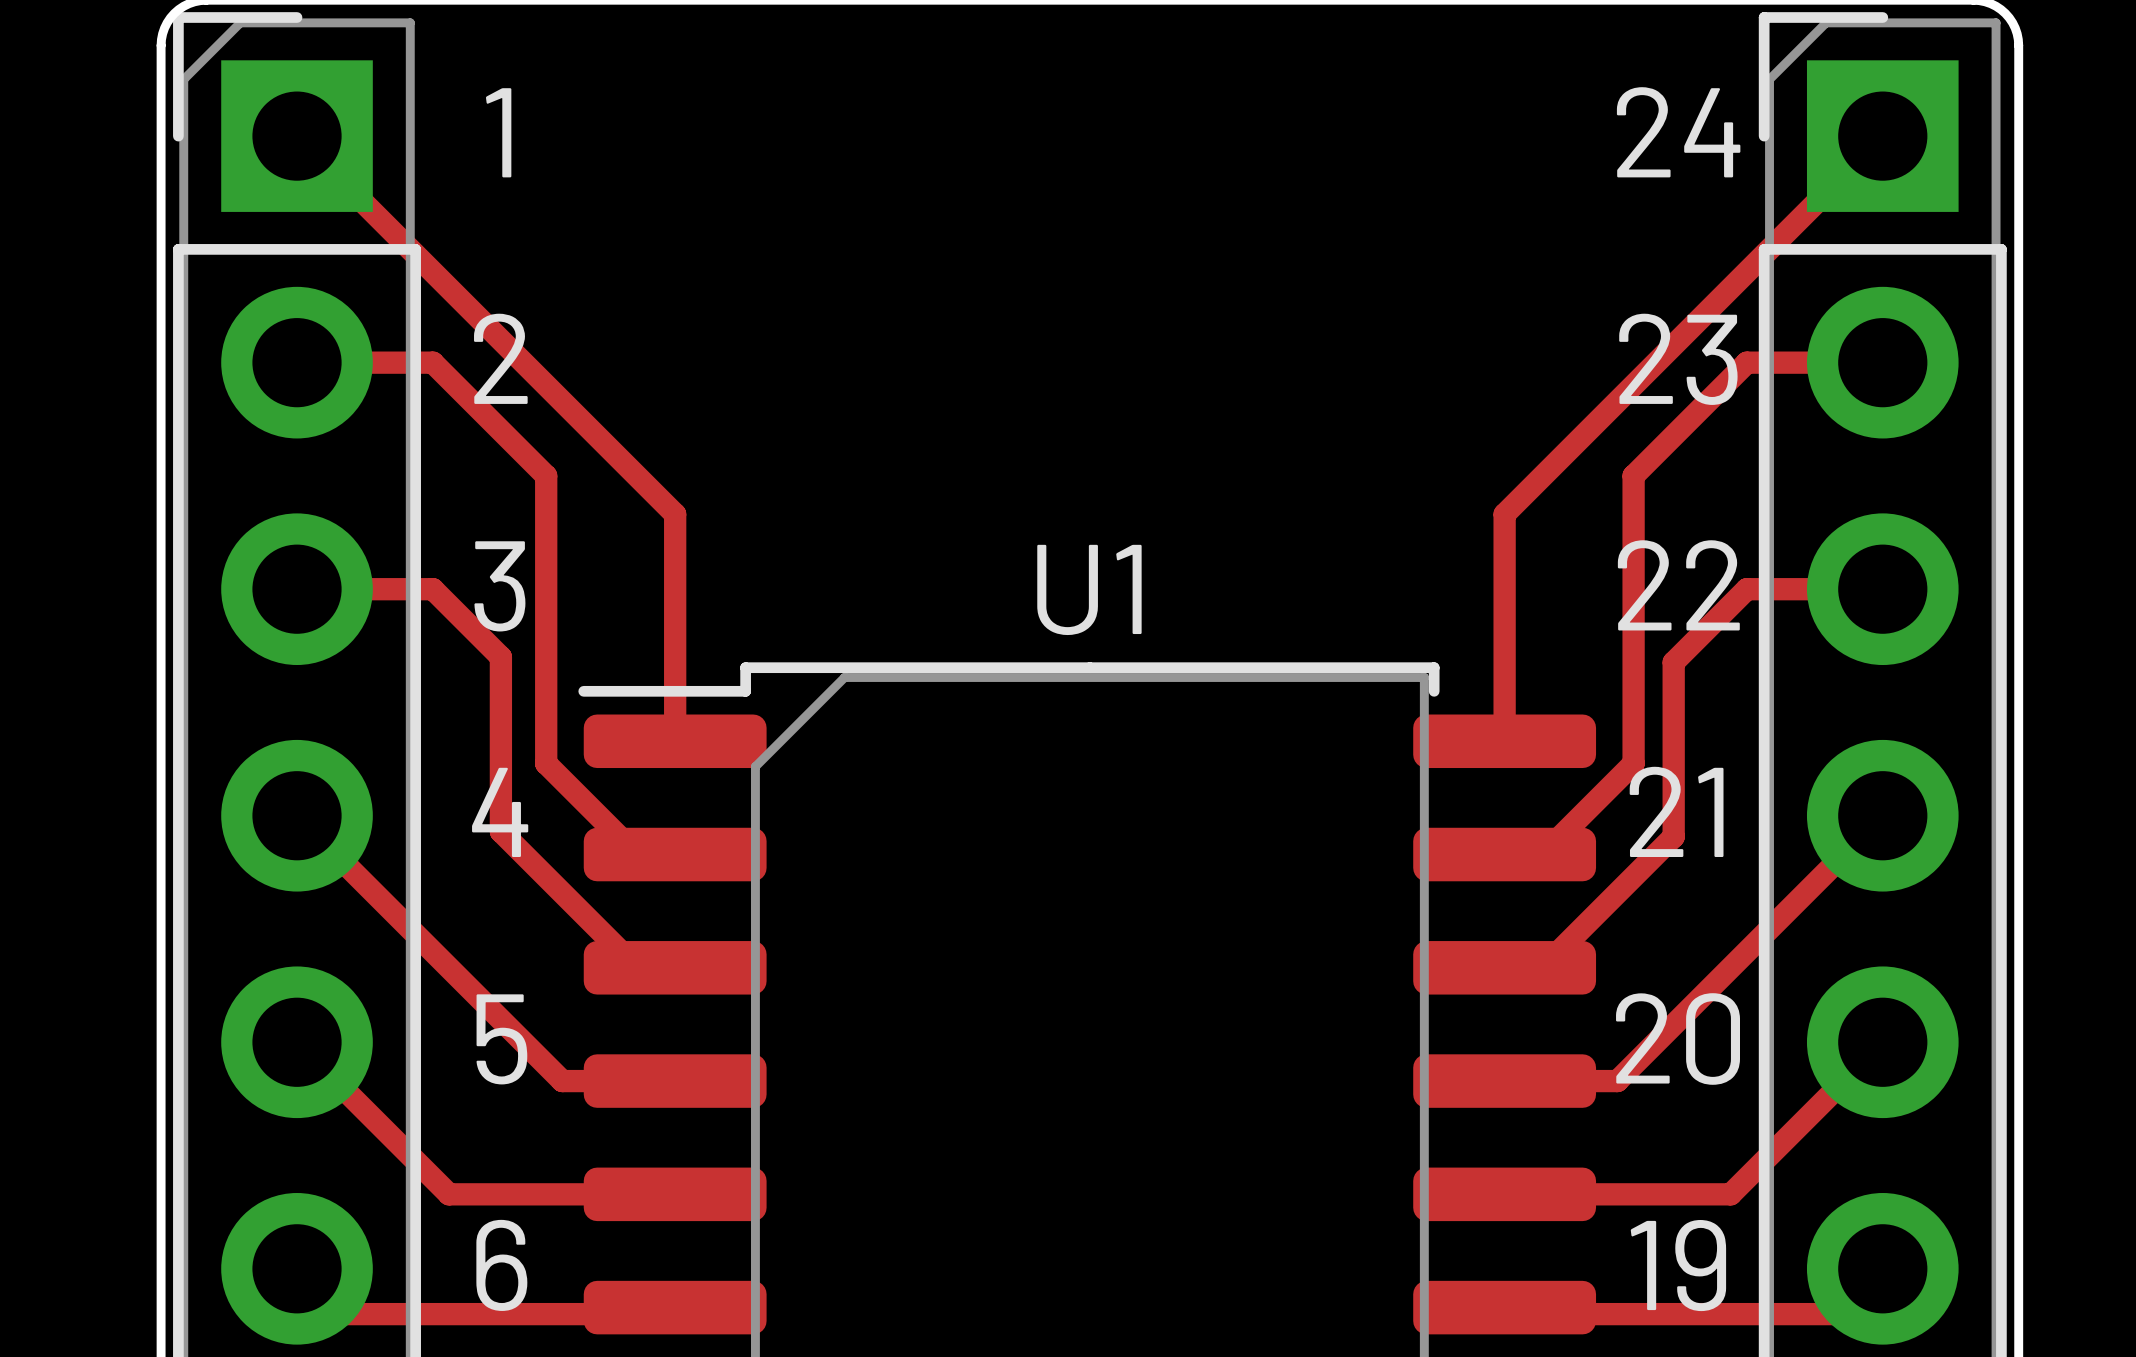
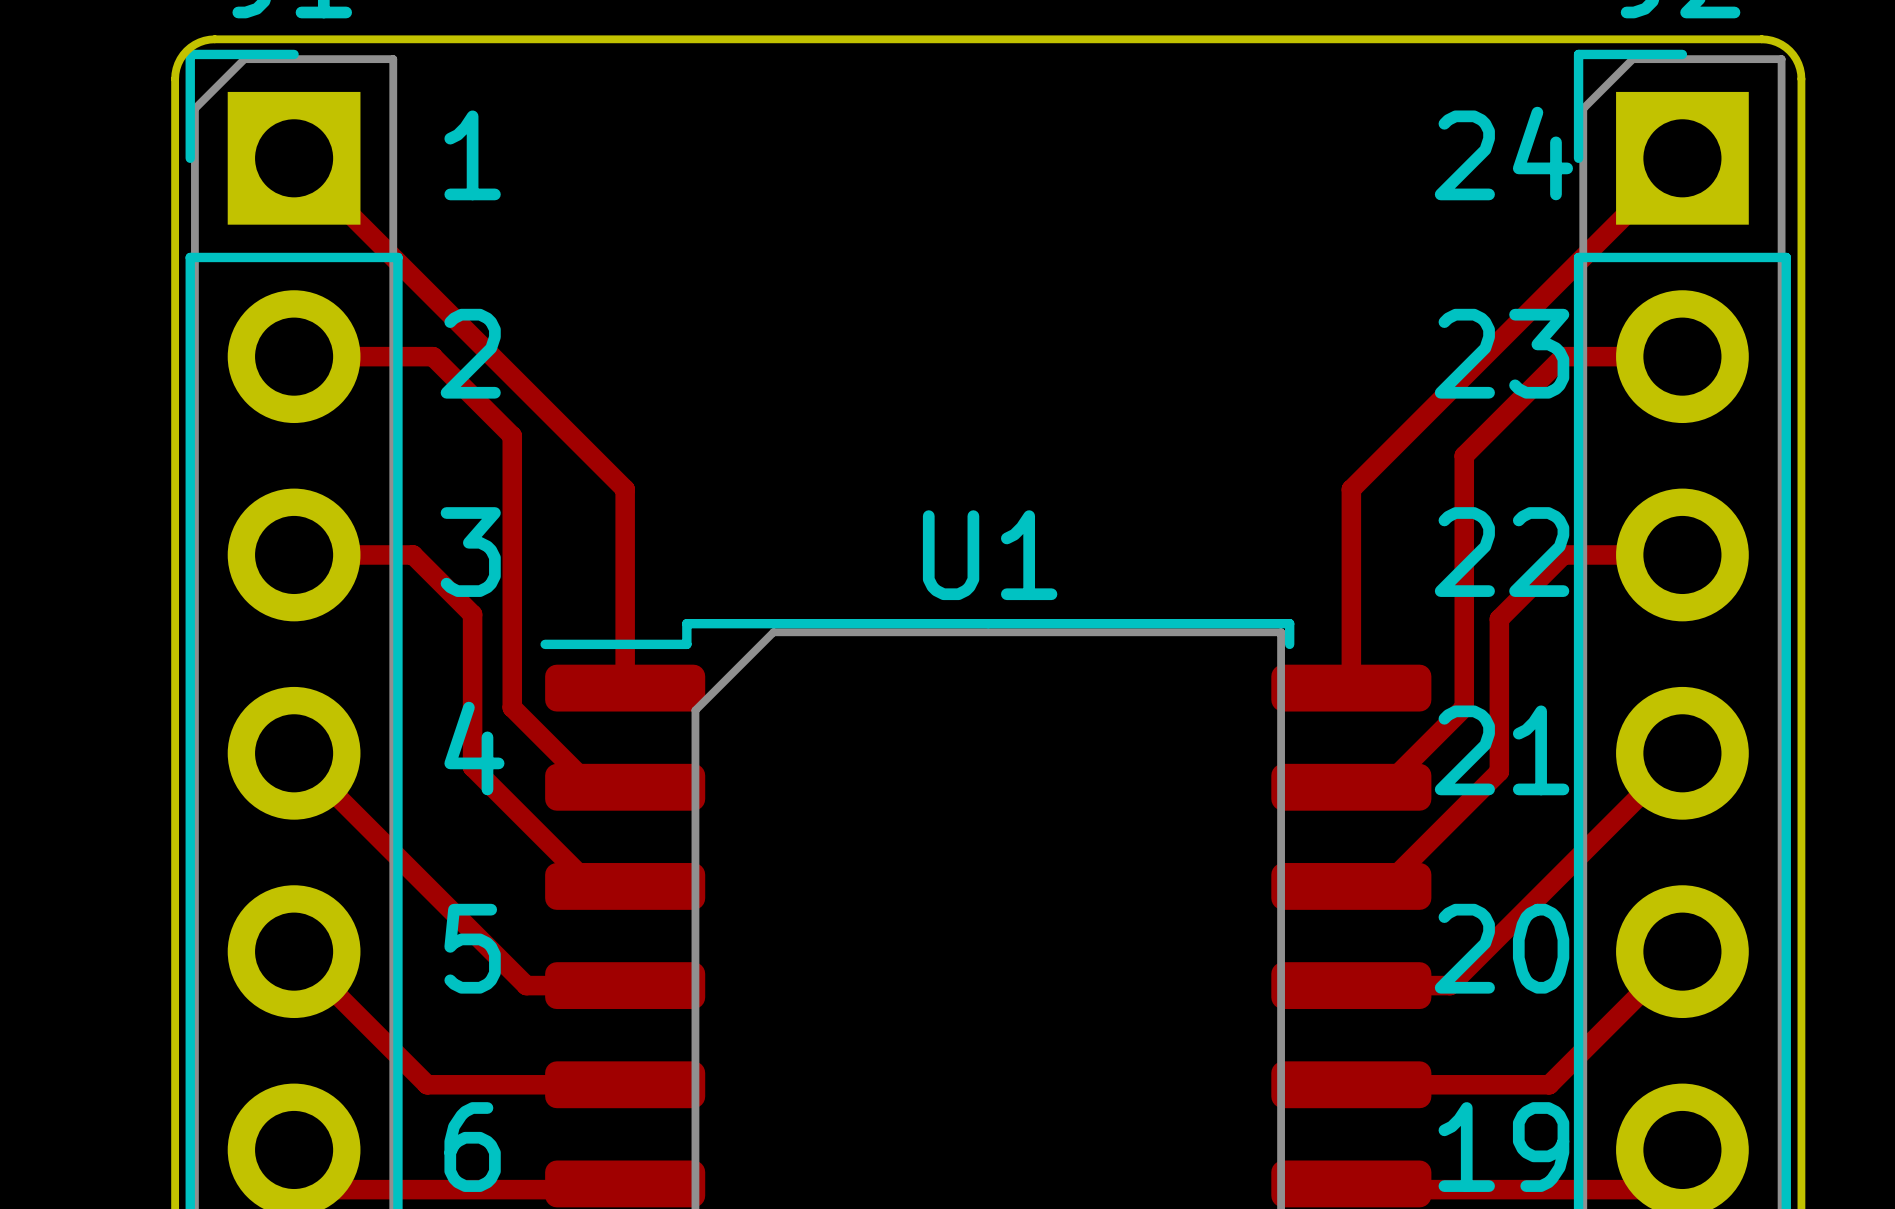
track: (432, 362) (546, 475) -> (413, 356) (432, 356) (512, 435) (512, 455)

